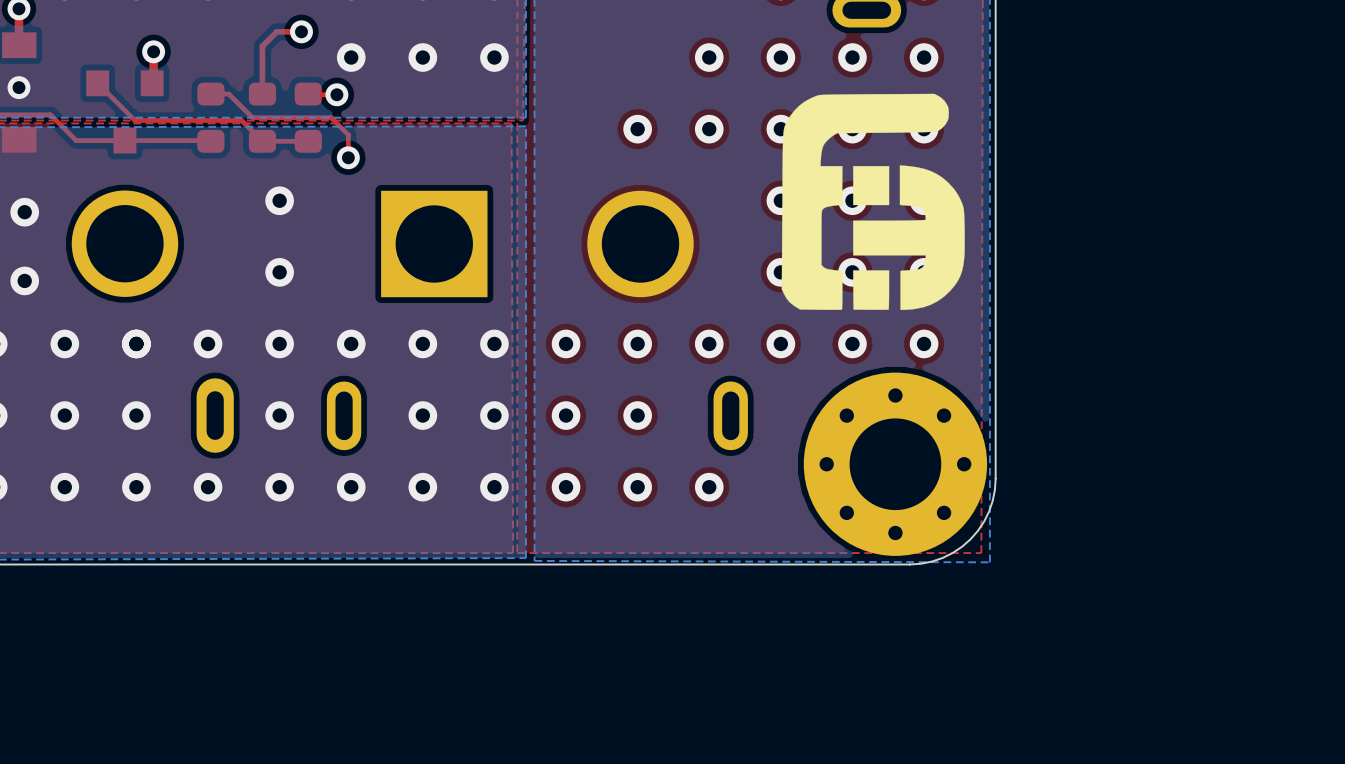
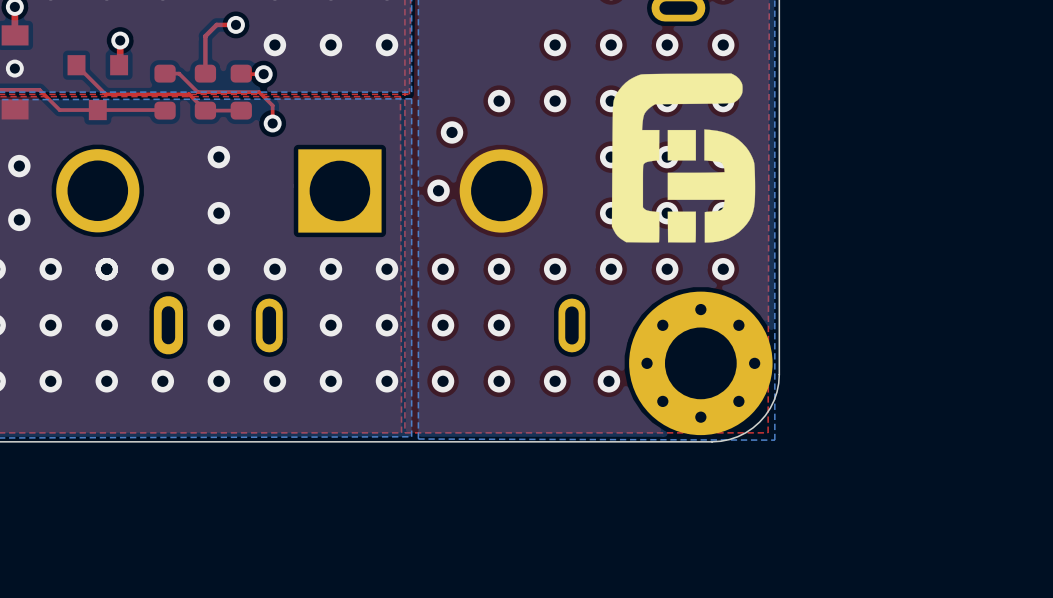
via: none -> (452, 132)
via: none -> (438, 190)
via: none -> (608, 381)

